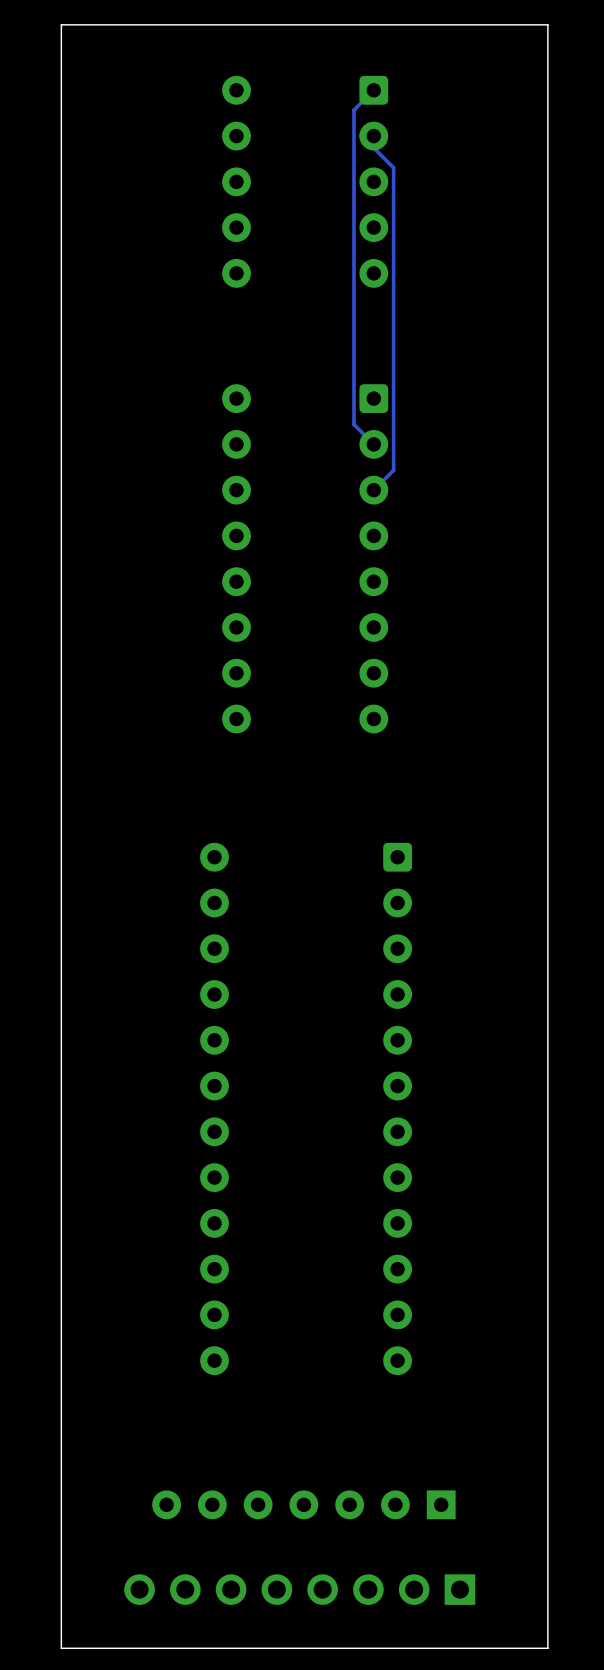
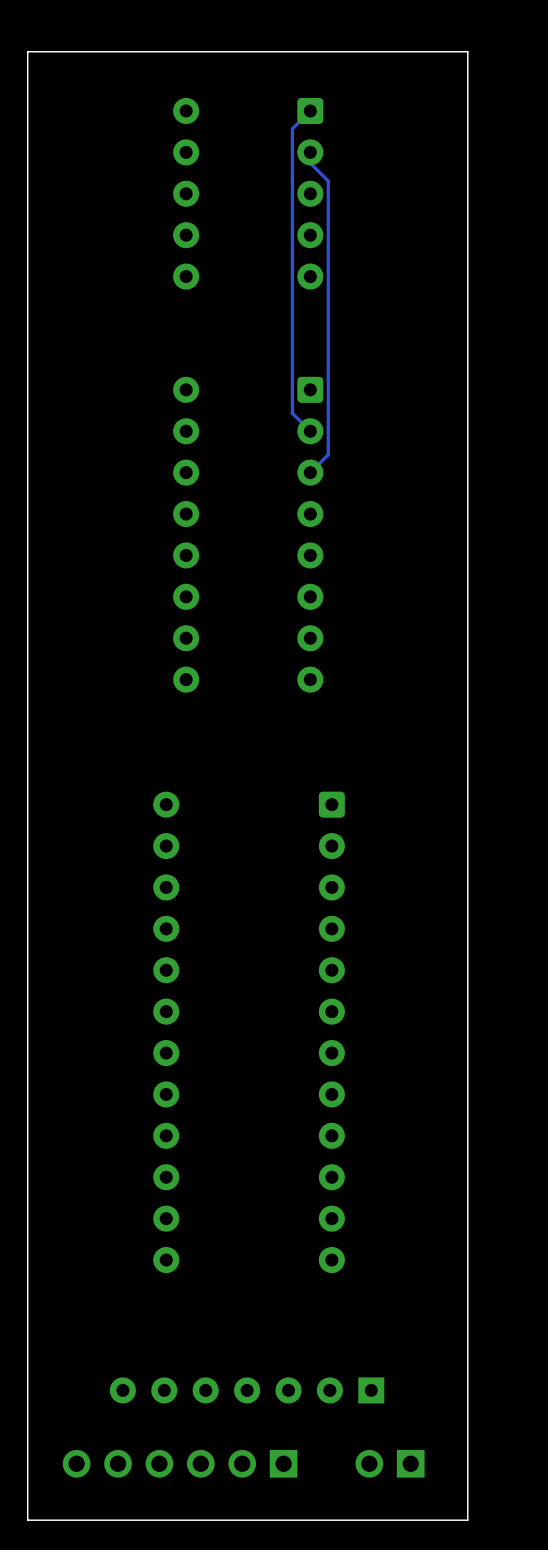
part: none -> (180, 1463)
part: none -> (390, 1463)
part: (299, 1589) -> none

